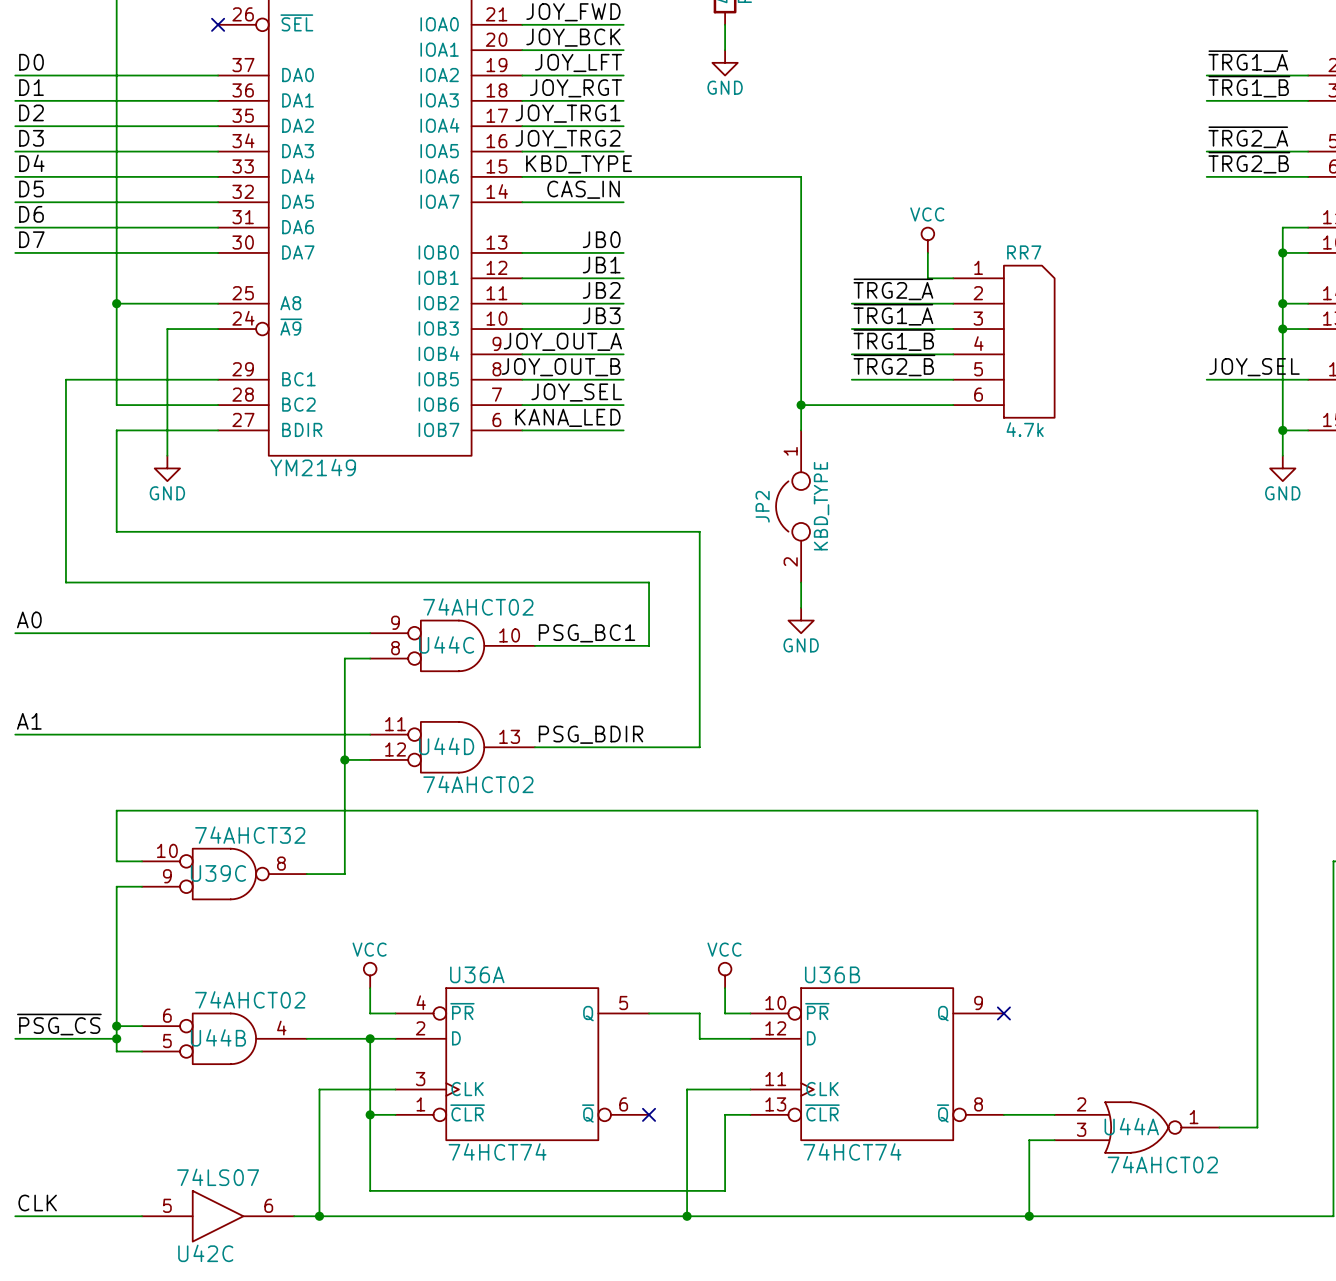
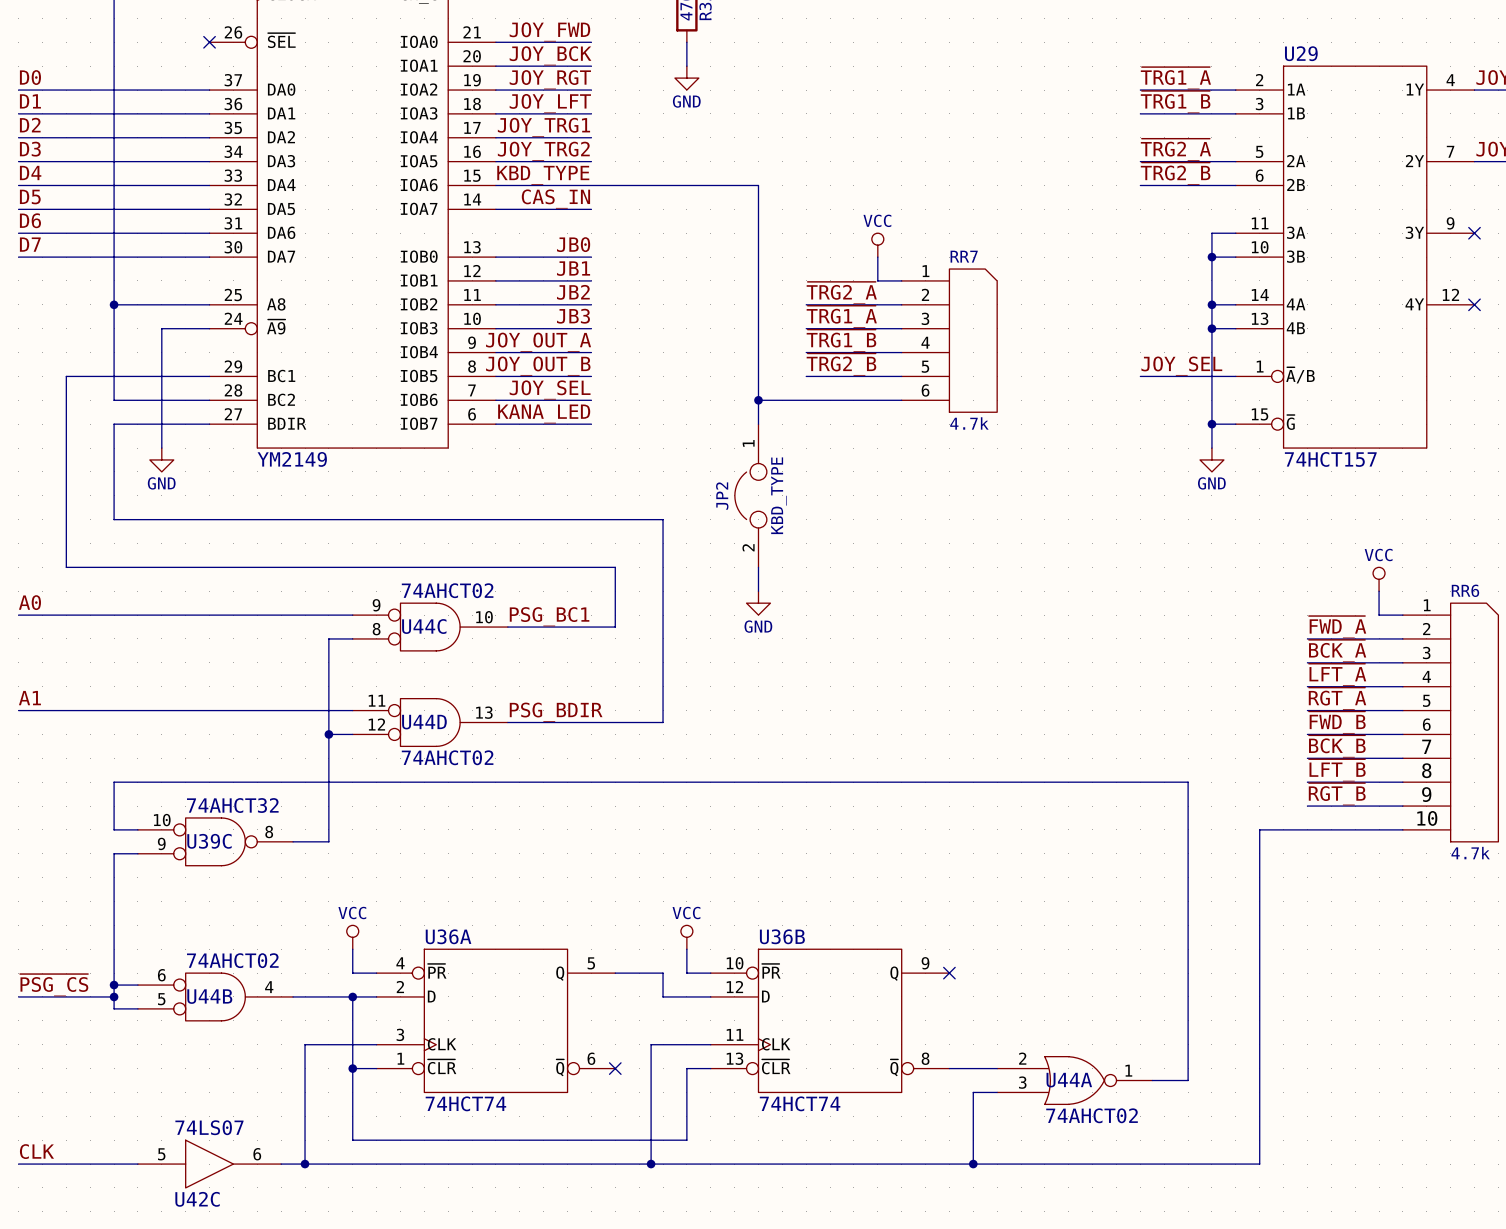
label: JOY_LFT (578, 62) -> JOY_RGT (550, 79)
label: JOY_RGT (575, 88) -> JOY_LFT (550, 103)

